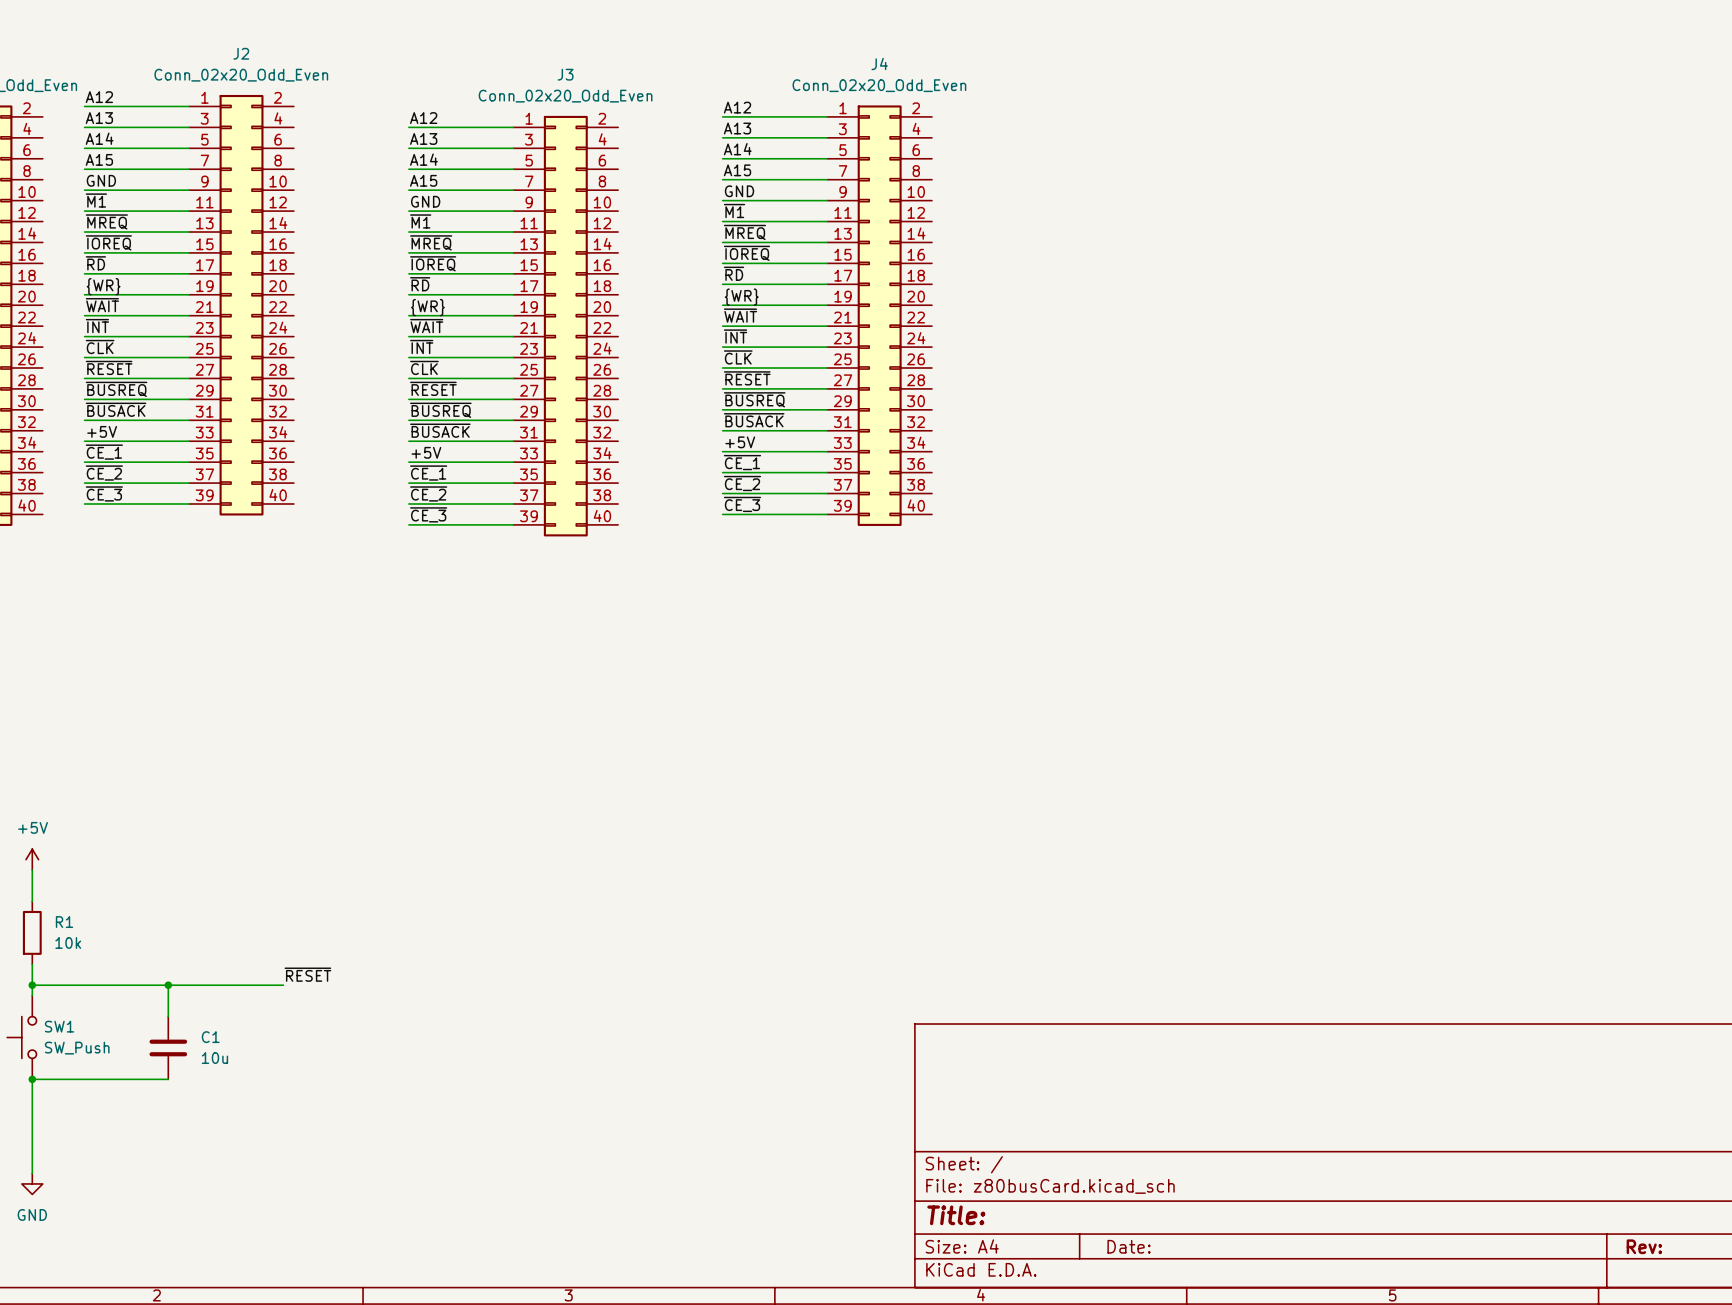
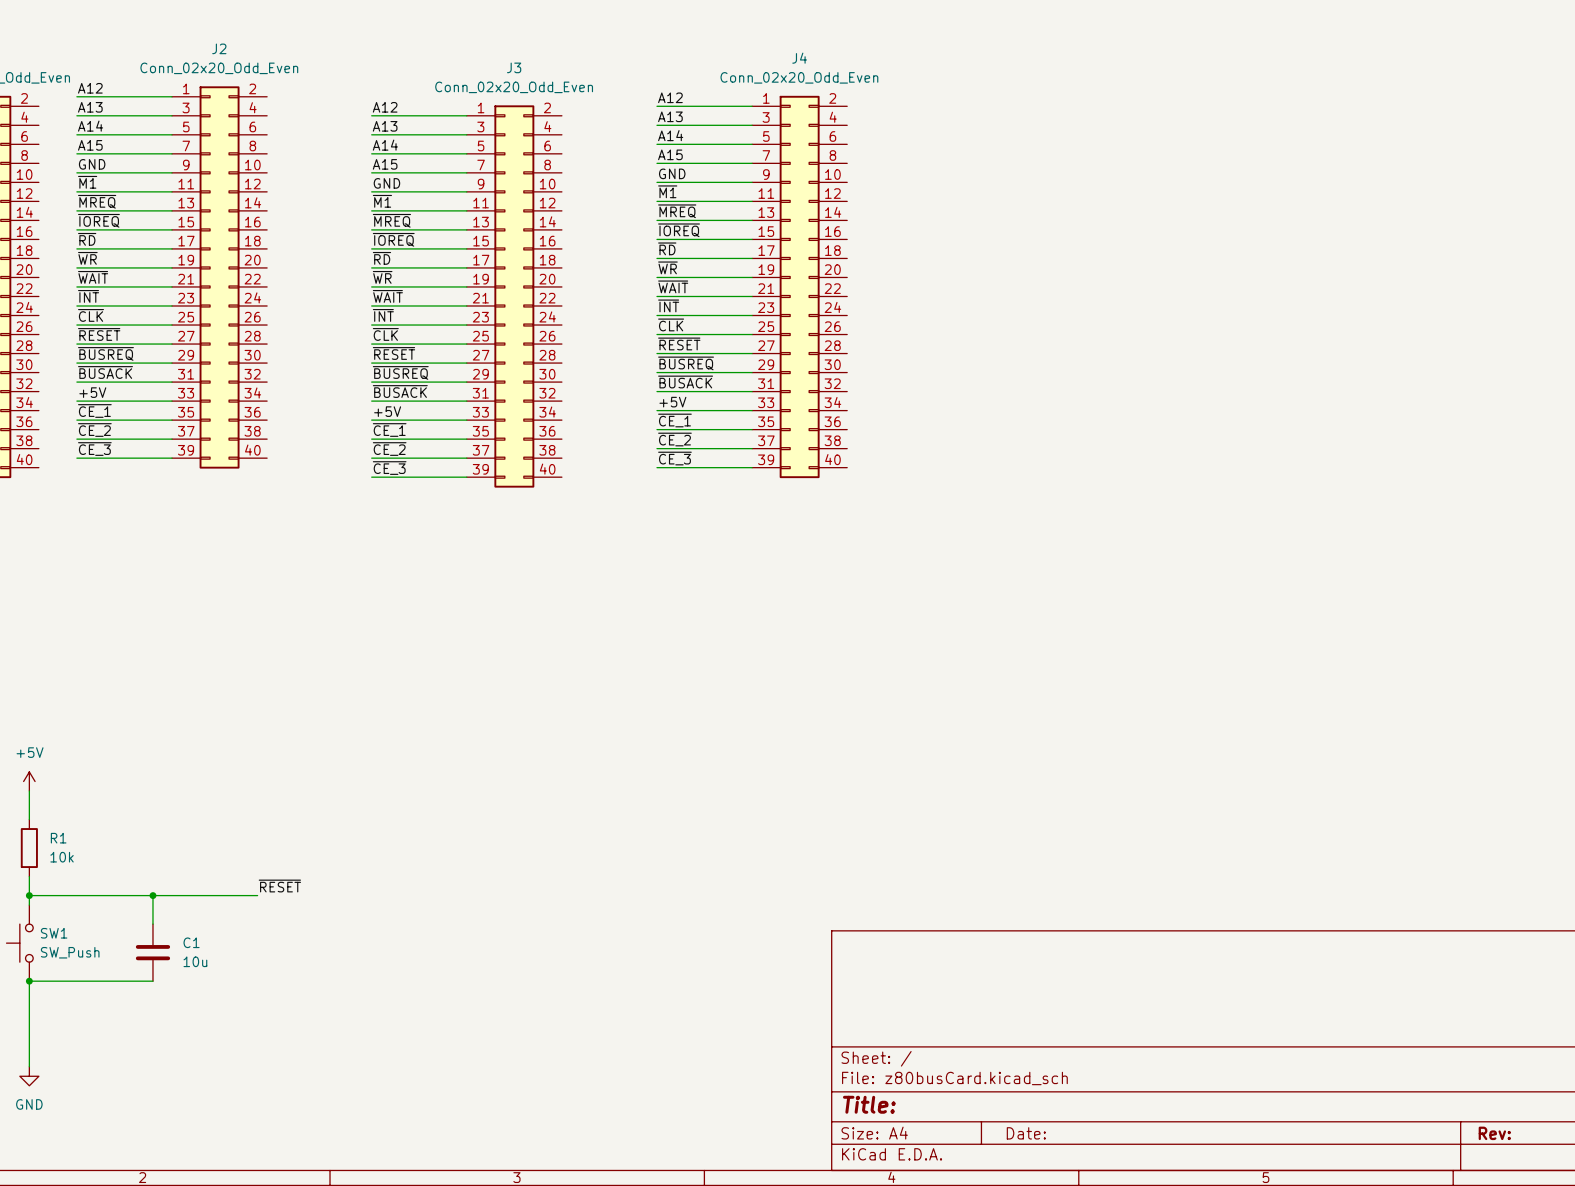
label: {WR} (103, 286) -> ~{WR} (87, 258)
label: {WR} (741, 297) -> ~{WR} (667, 267)
label: {WR} (427, 307) -> ~{WR} (382, 277)

